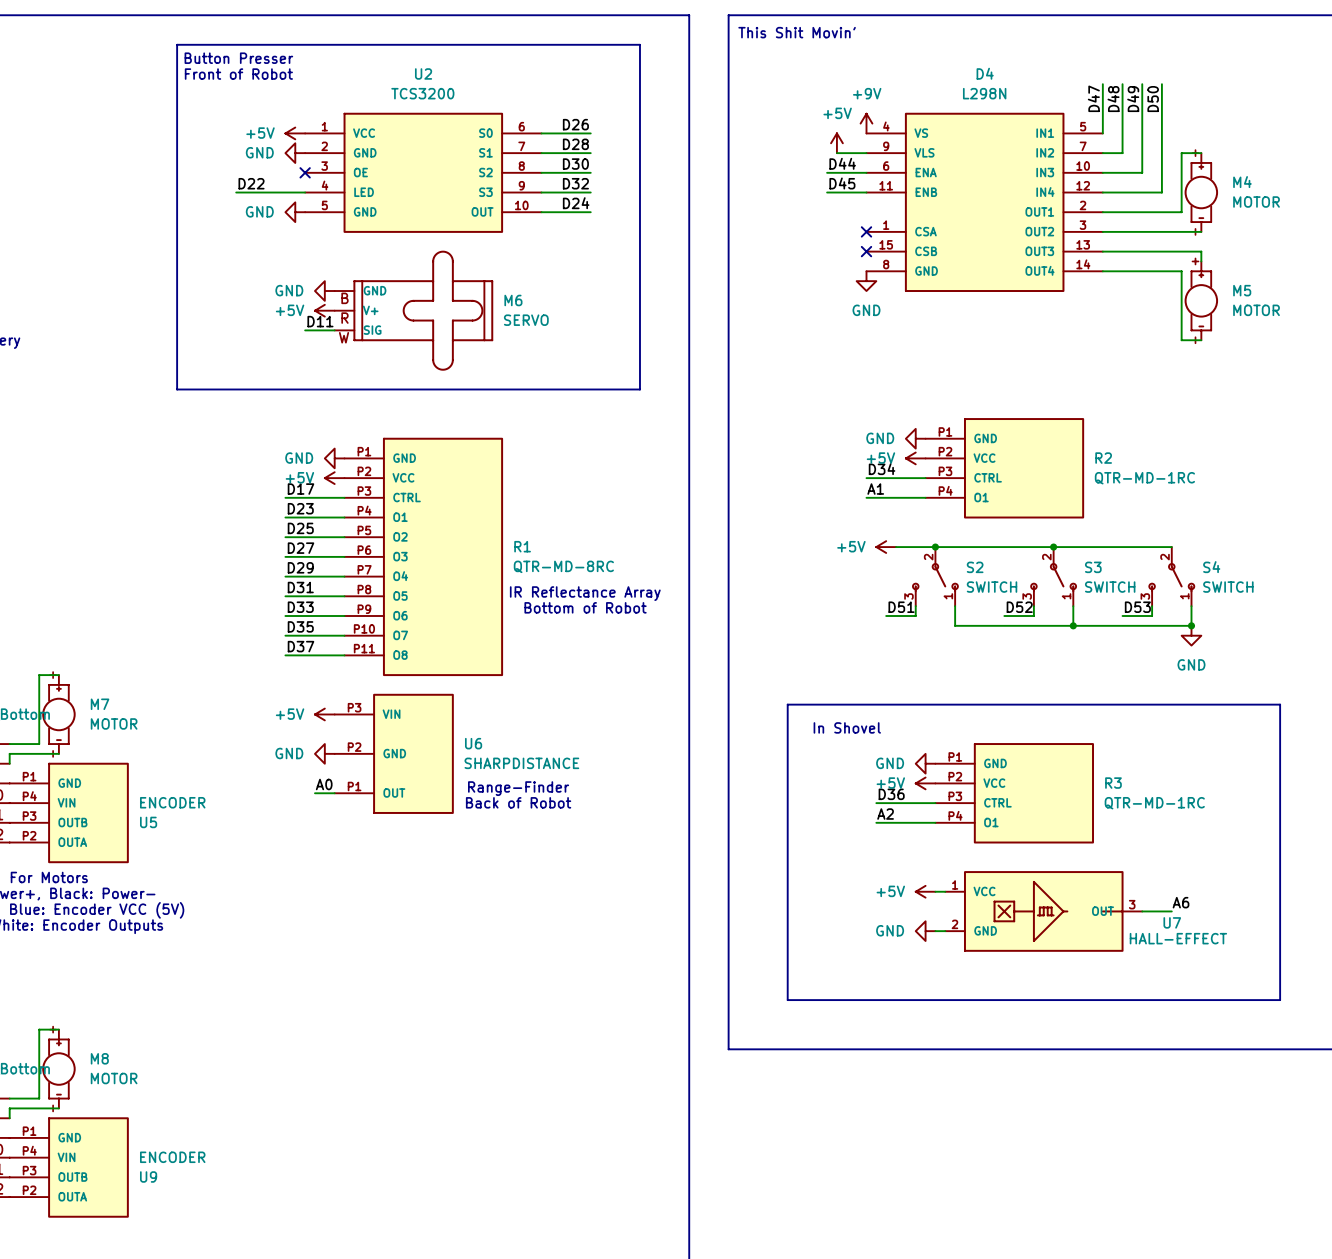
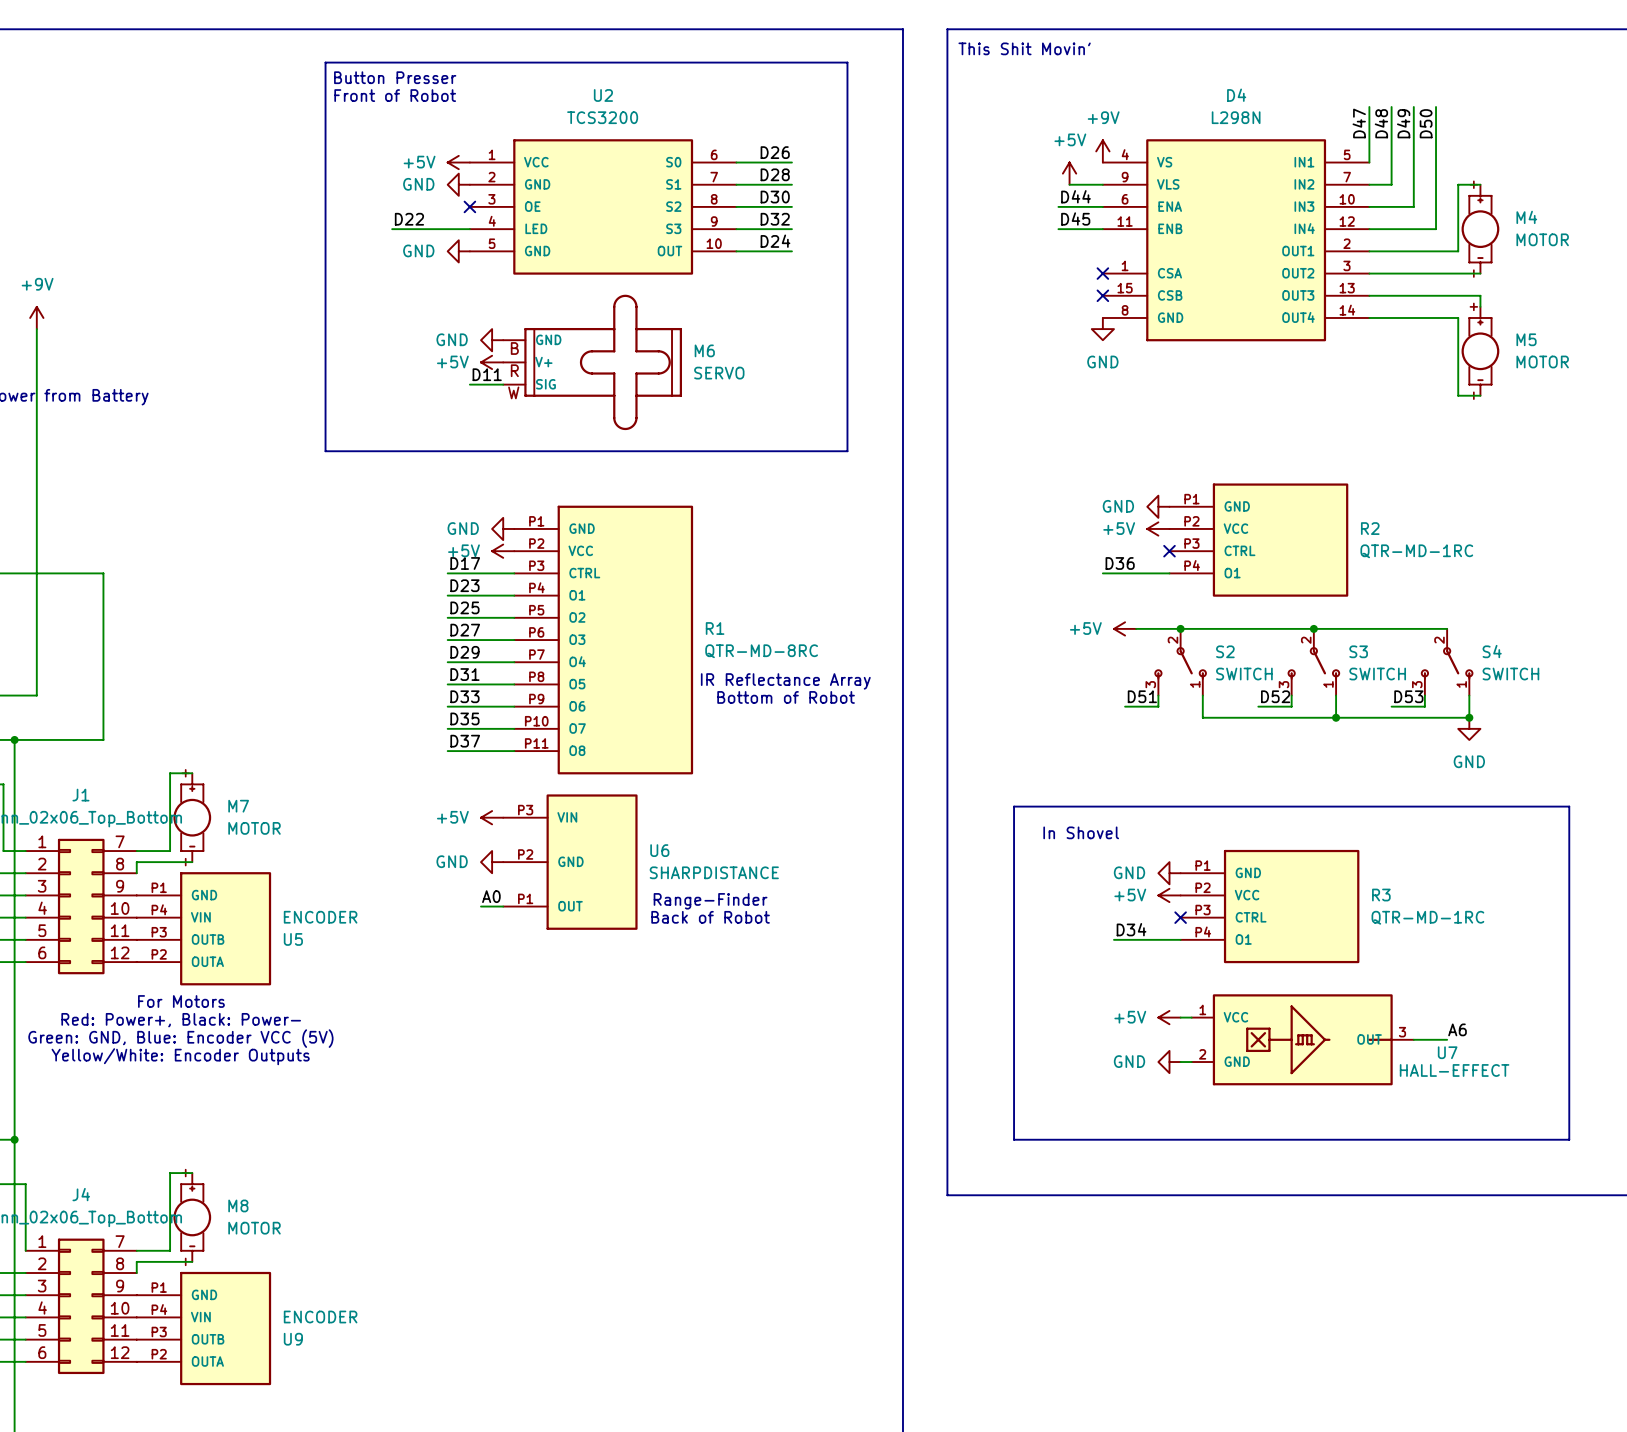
label: D34 (882, 469) -> none
wire: (866, 478) (925, 478) -> none
no-connect mark: none -> (1169, 551)
label: A1 (875, 489) -> D36 (1120, 563)
label: D36 (891, 794) -> none
wire: (876, 803) (935, 803) -> none
no-connect mark: none -> (1180, 917)
label: A2 (885, 814) -> D34 (1131, 929)

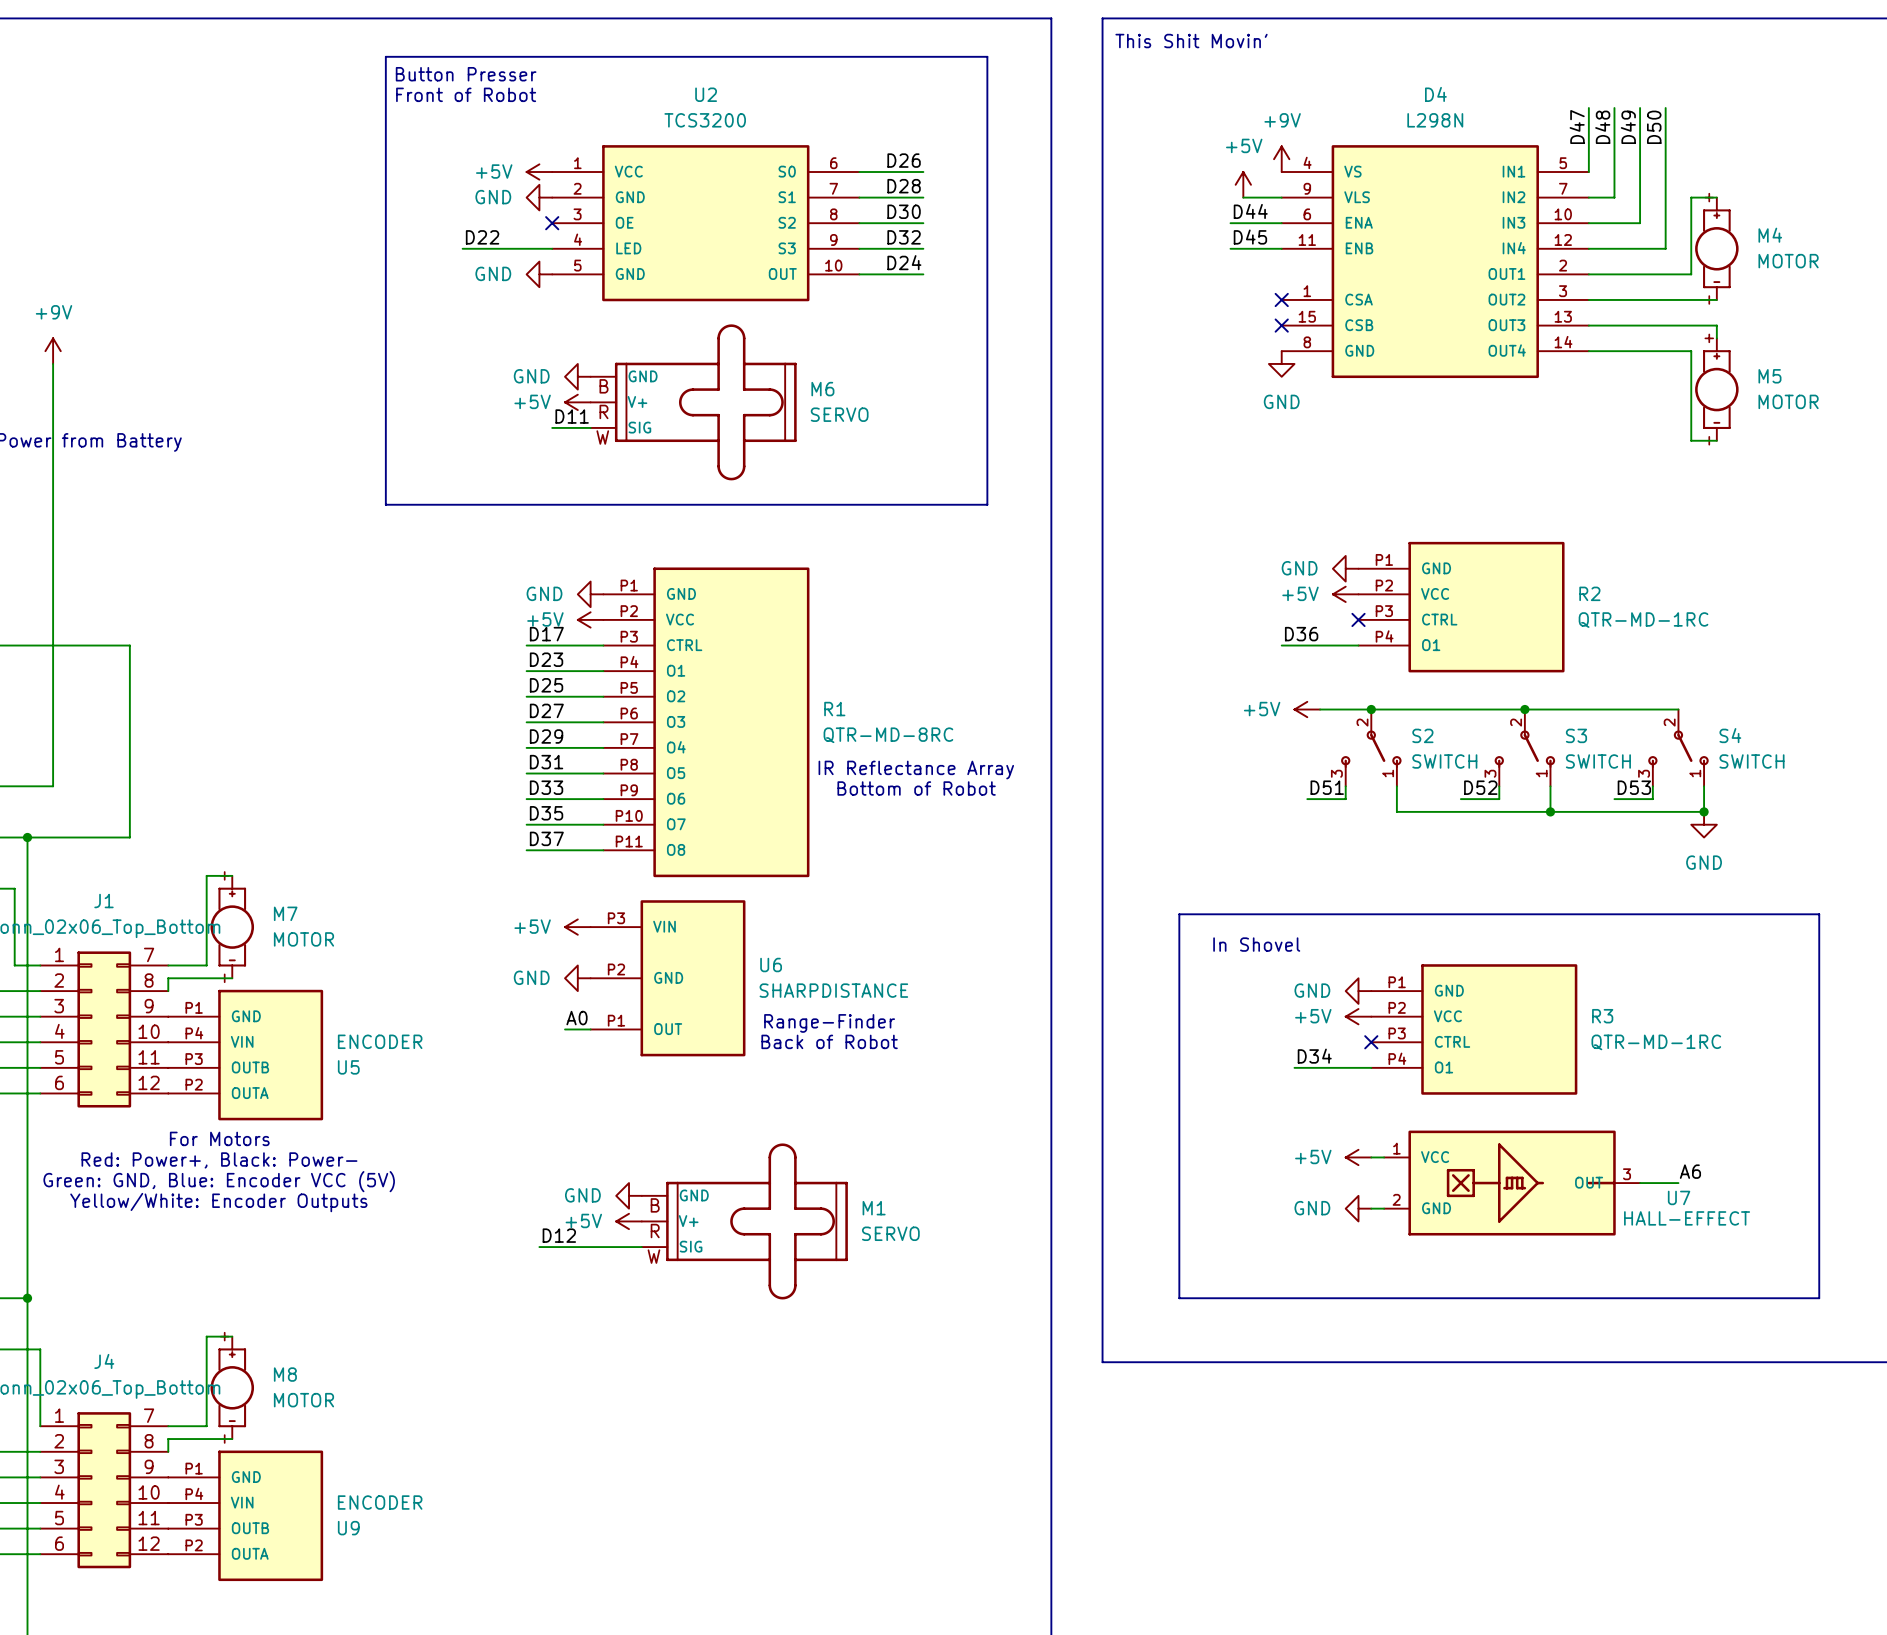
power symbol: none -> GND (629, 1195)
power symbol: none -> +5V (629, 1221)
M1: none -> SERVO (744, 1221)
label: none -> D12 (559, 1235)
wire: none -> (539, 1247) (641, 1247)

